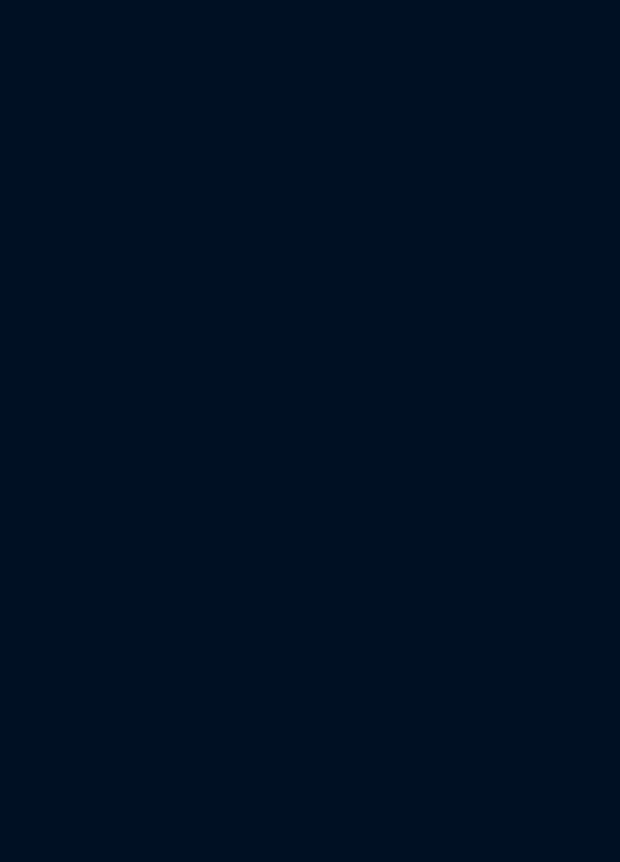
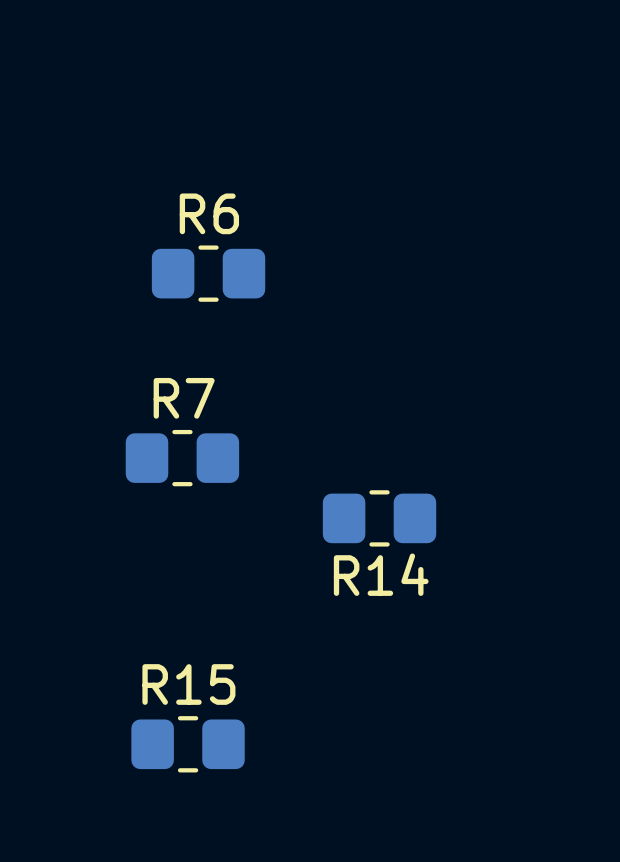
R6: none -> (208, 273)
R7: none -> (182, 458)
R14: none -> (379, 518)
R15: none -> (188, 744)

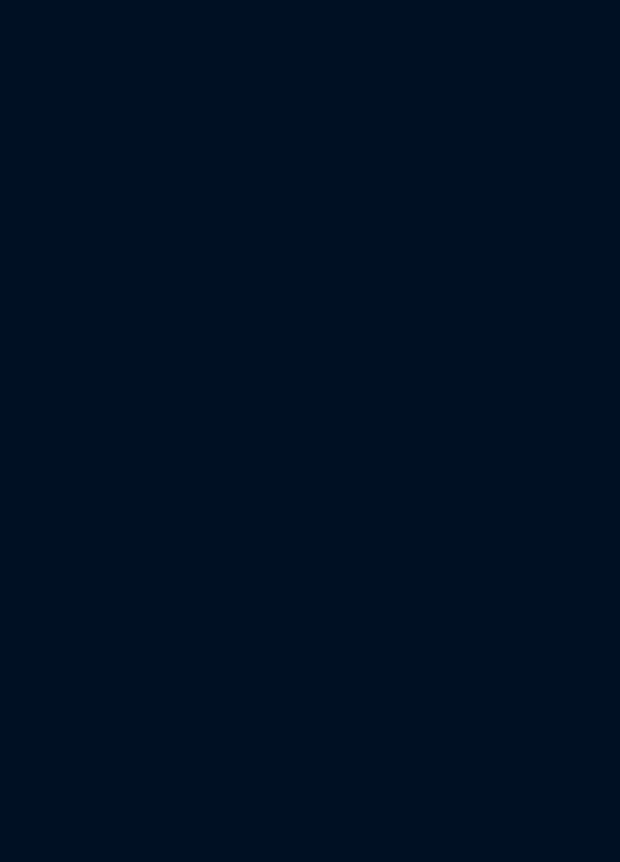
R6: (208, 273) -> none
R7: (182, 458) -> none
R14: (379, 518) -> none
R15: (188, 744) -> none

